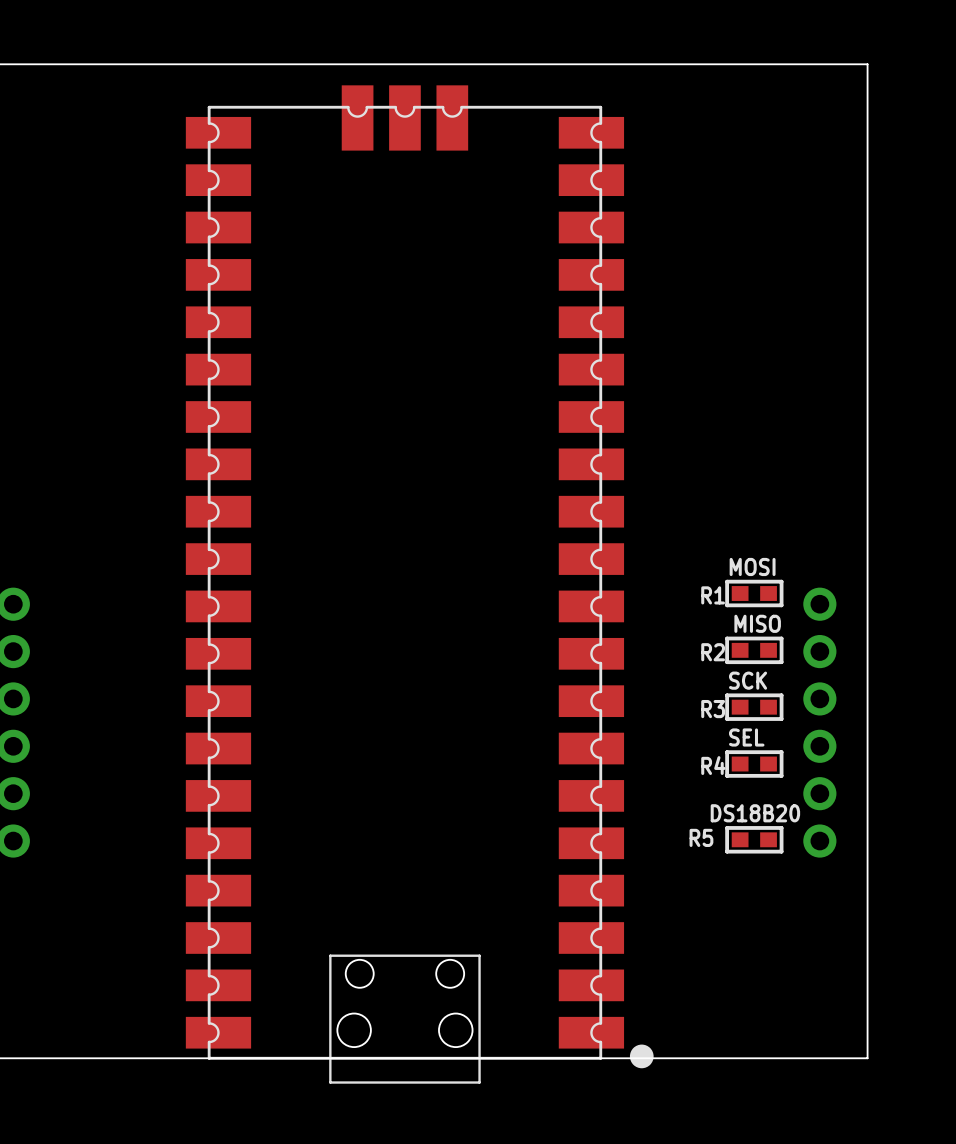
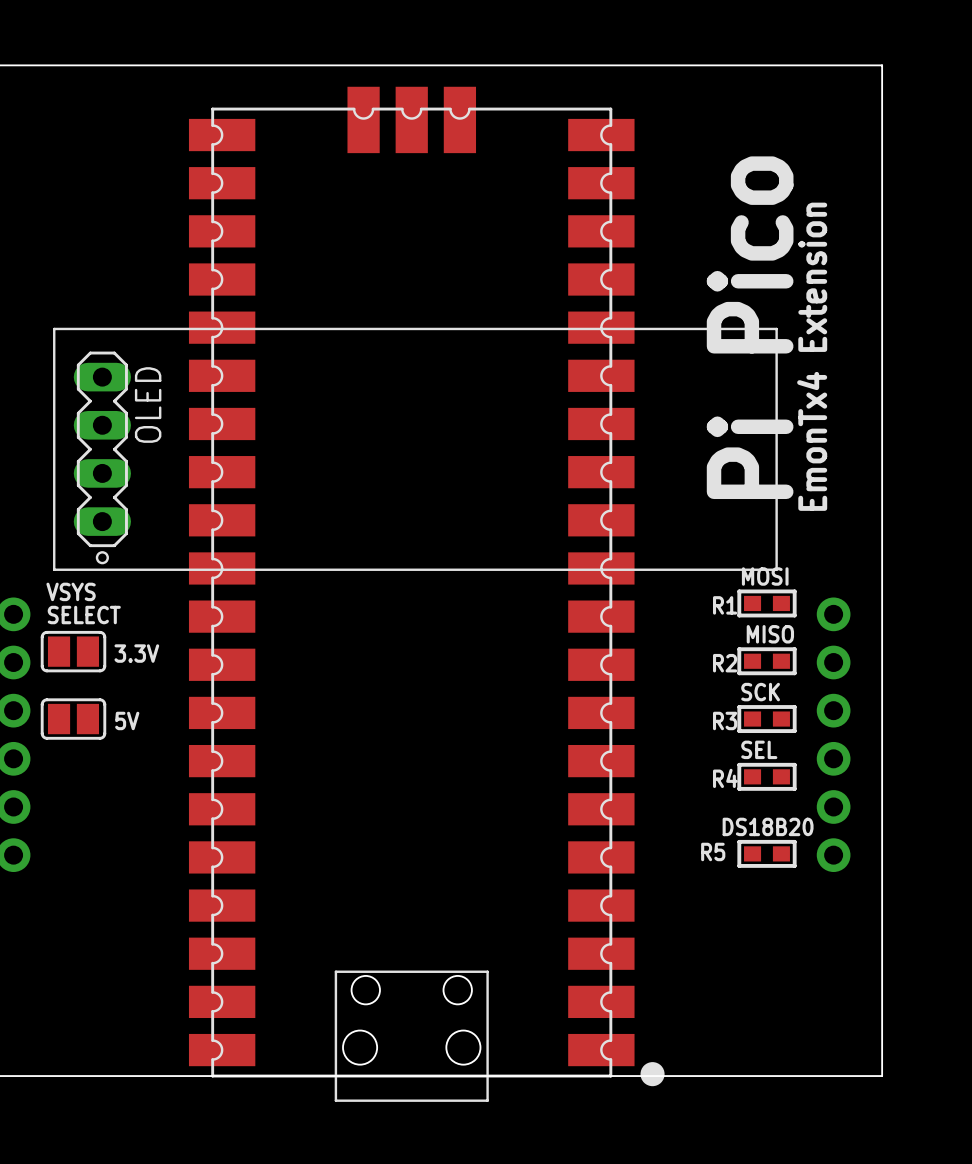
text: none -> Pi Pico (750, 327)
text: none -> EmonTx4 Extension (812, 356)
OLED: none -> (415, 449)
text: none -> VSYS (71, 591)
text: none -> SELECT (84, 615)
part: none -> (73, 651)
text: none -> 3.3V (136, 653)
part: none -> (73, 719)
text: none -> 5V (127, 720)

